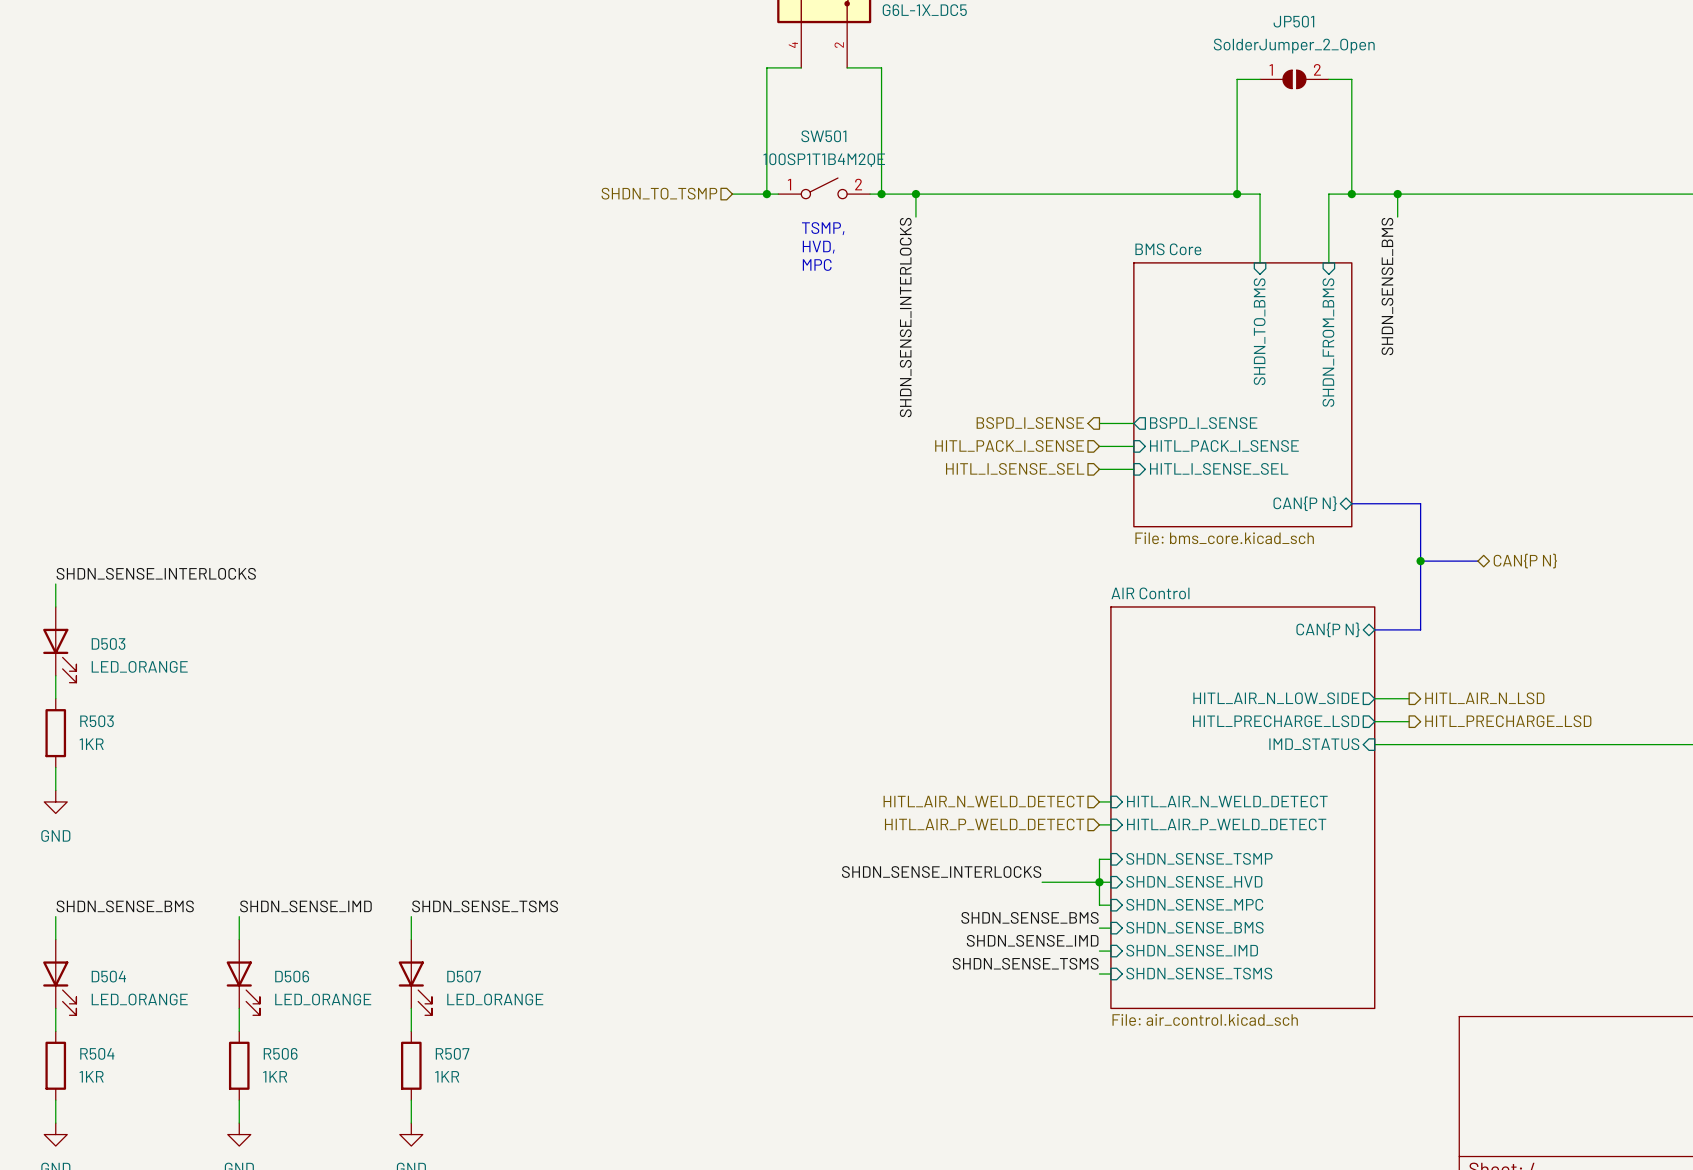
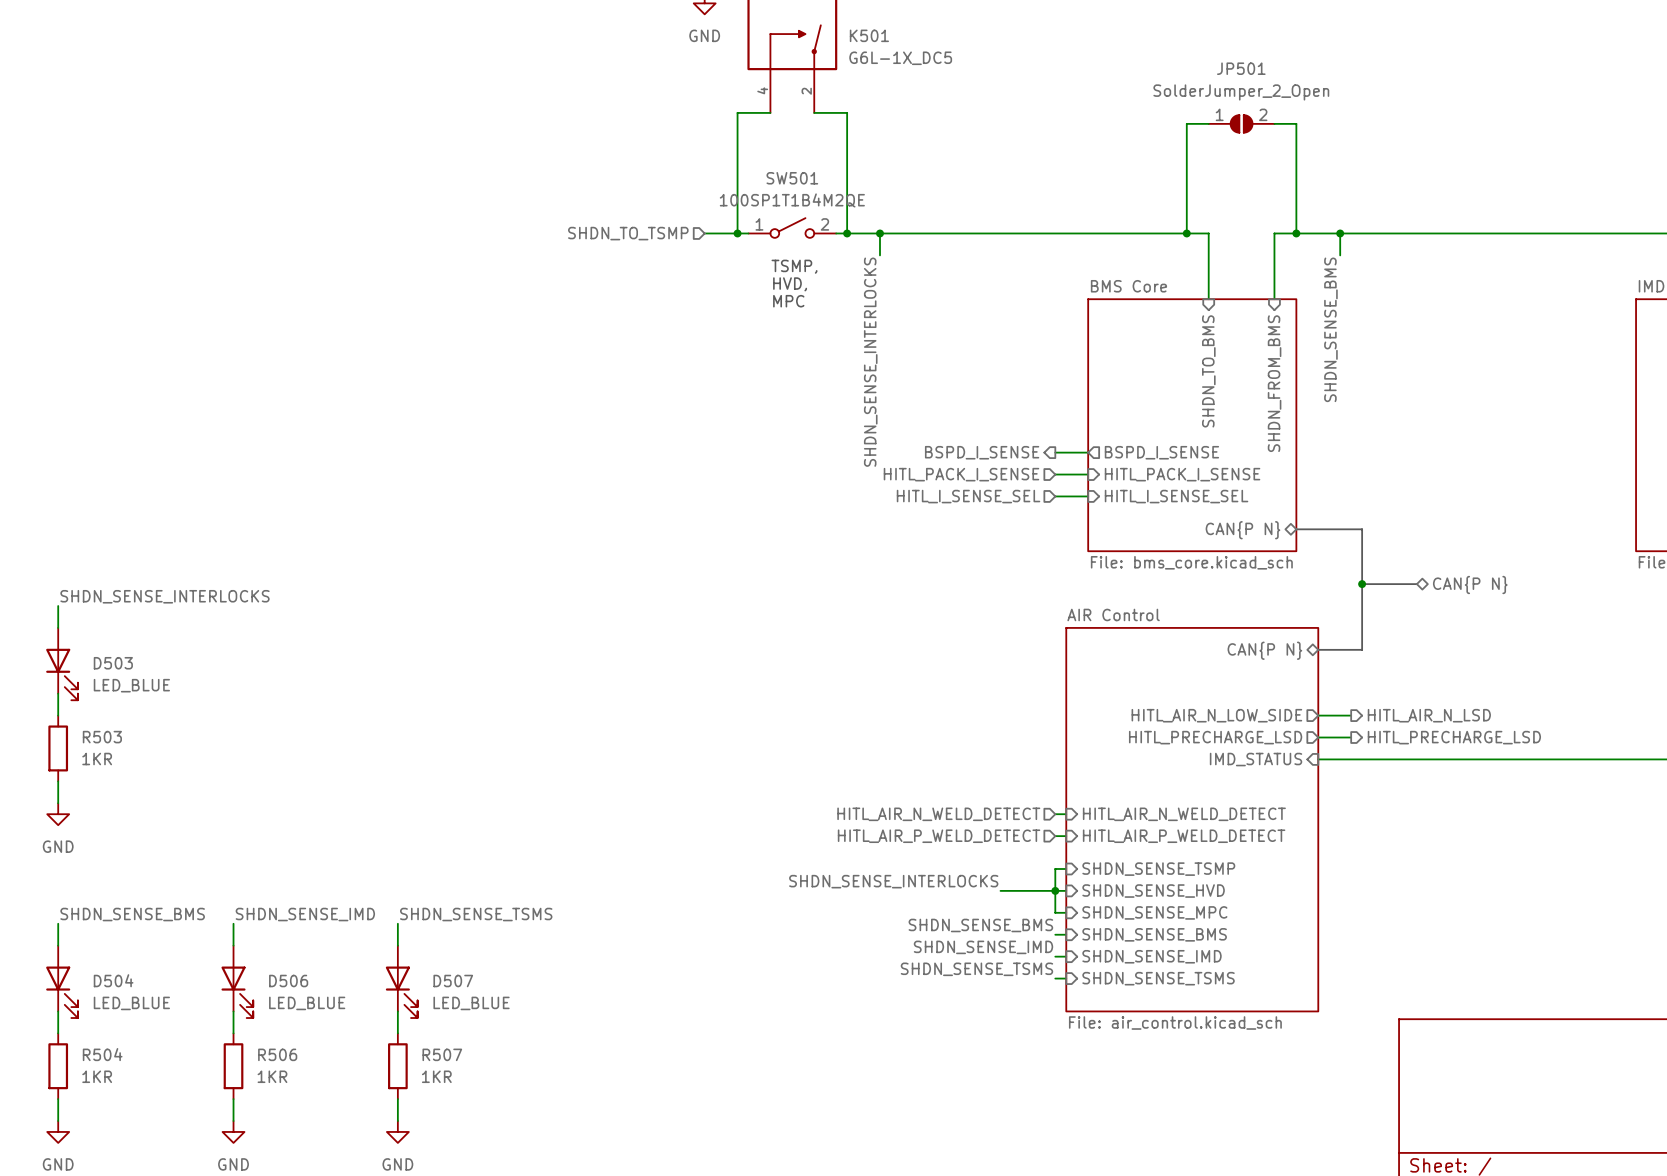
D503 value: LED_ORANGE (139, 666) -> LED_BLUE (131, 685)
D504 value: LED_ORANGE (139, 999) -> LED_BLUE (131, 1003)
D506 value: LED_ORANGE (323, 999) -> LED_BLUE (307, 1003)
D507 value: LED_ORANGE (495, 999) -> LED_BLUE (471, 1003)

